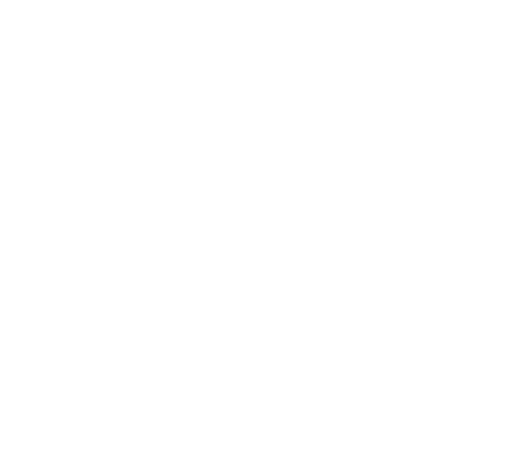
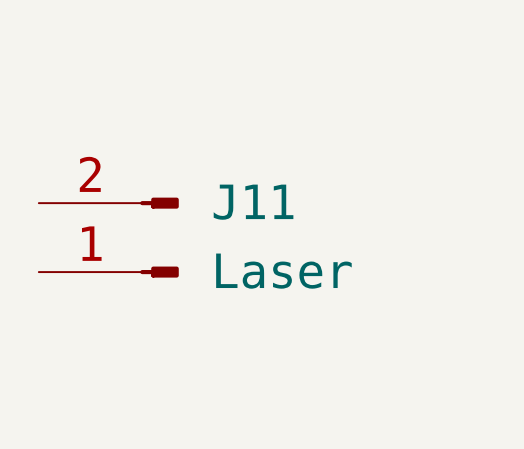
J11: none -> Laser (108, 237)

